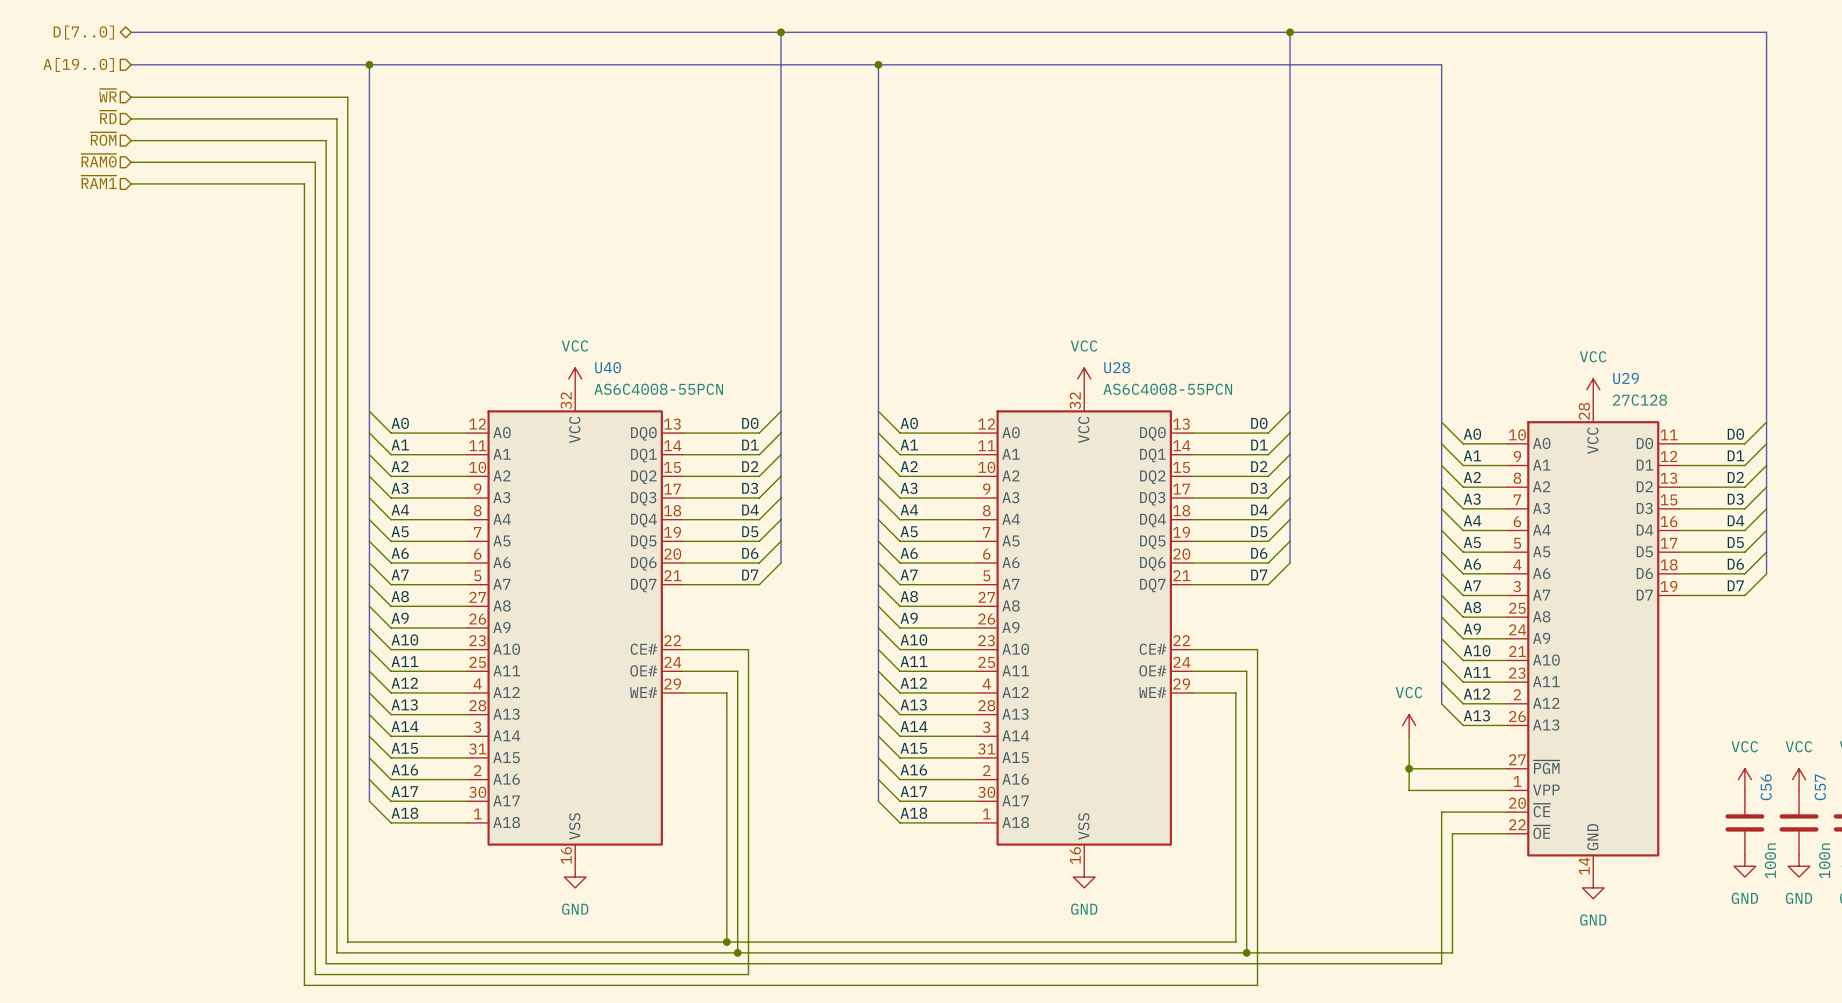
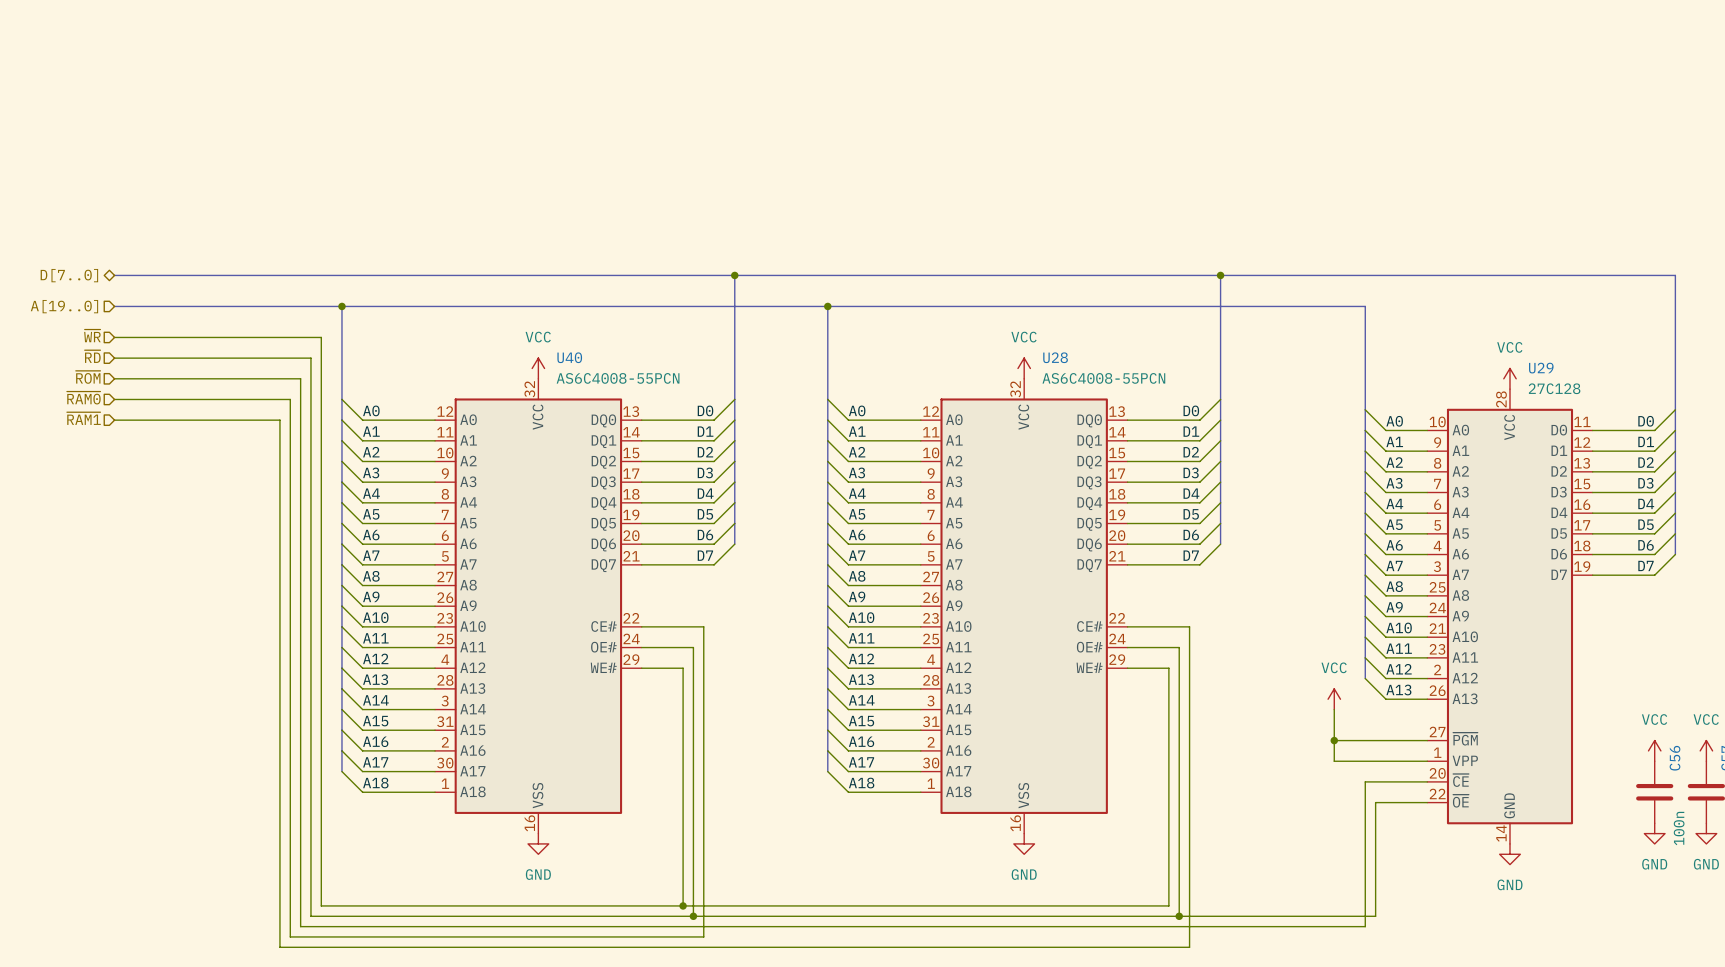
hierarchical label: D[7..0] (83, 32) -> none
bus: (131, 32) (1766, 32) (1766, 281) -> (114, 275) (1675, 275)
bus: (780, 32) (780, 281) -> none
junction: (780, 32) -> none
bus: (1290, 32) (1290, 281) -> none
junction: (1290, 32) -> none
hierarchical label: A[19..0] (78, 64) -> none
bus: (131, 64) (1441, 64) (1441, 313) -> (114, 306) (1365, 306)
bus: (369, 64) (369, 313) -> none
junction: (369, 64) -> none
bus: (878, 64) (878, 313) -> none
junction: (878, 64) -> none
hierarchical label: ~{WR} (107, 95) -> none
wire: (131, 97) (347, 97) (347, 346) -> (114, 337) (321, 337)
hierarchical label: ~{RD} (108, 117) -> none
wire: (131, 118) (336, 118) (336, 368) -> (114, 358) (310, 358)
hierarchical label: ~{ROM} (103, 139) -> none
wire: (131, 140) (326, 140) (326, 389) -> (114, 378) (300, 378)
hierarchical label: ~{RAM0} (98, 160) -> none
wire: (131, 162) (315, 162) (315, 411) -> (114, 399) (290, 399)
hierarchical label: ~{RAM1} (98, 182) -> none
wire: (131, 183) (304, 183) (304, 433) -> (114, 420) (279, 420)
hierarchical label: none -> D[7..0] (69, 275)
junction: none -> (734, 275)
junction: none -> (1220, 275)
junction: none -> (341, 306)
junction: none -> (827, 306)
hierarchical label: none -> A[19..0] (64, 306)
hierarchical label: none -> ~{WR} (92, 335)
hierarchical label: none -> ~{RD} (92, 356)
hierarchical label: none -> ~{ROM} (88, 377)
hierarchical label: none -> ~{RAM0} (83, 397)
hierarchical label: none -> ~{RAM1} (83, 418)

